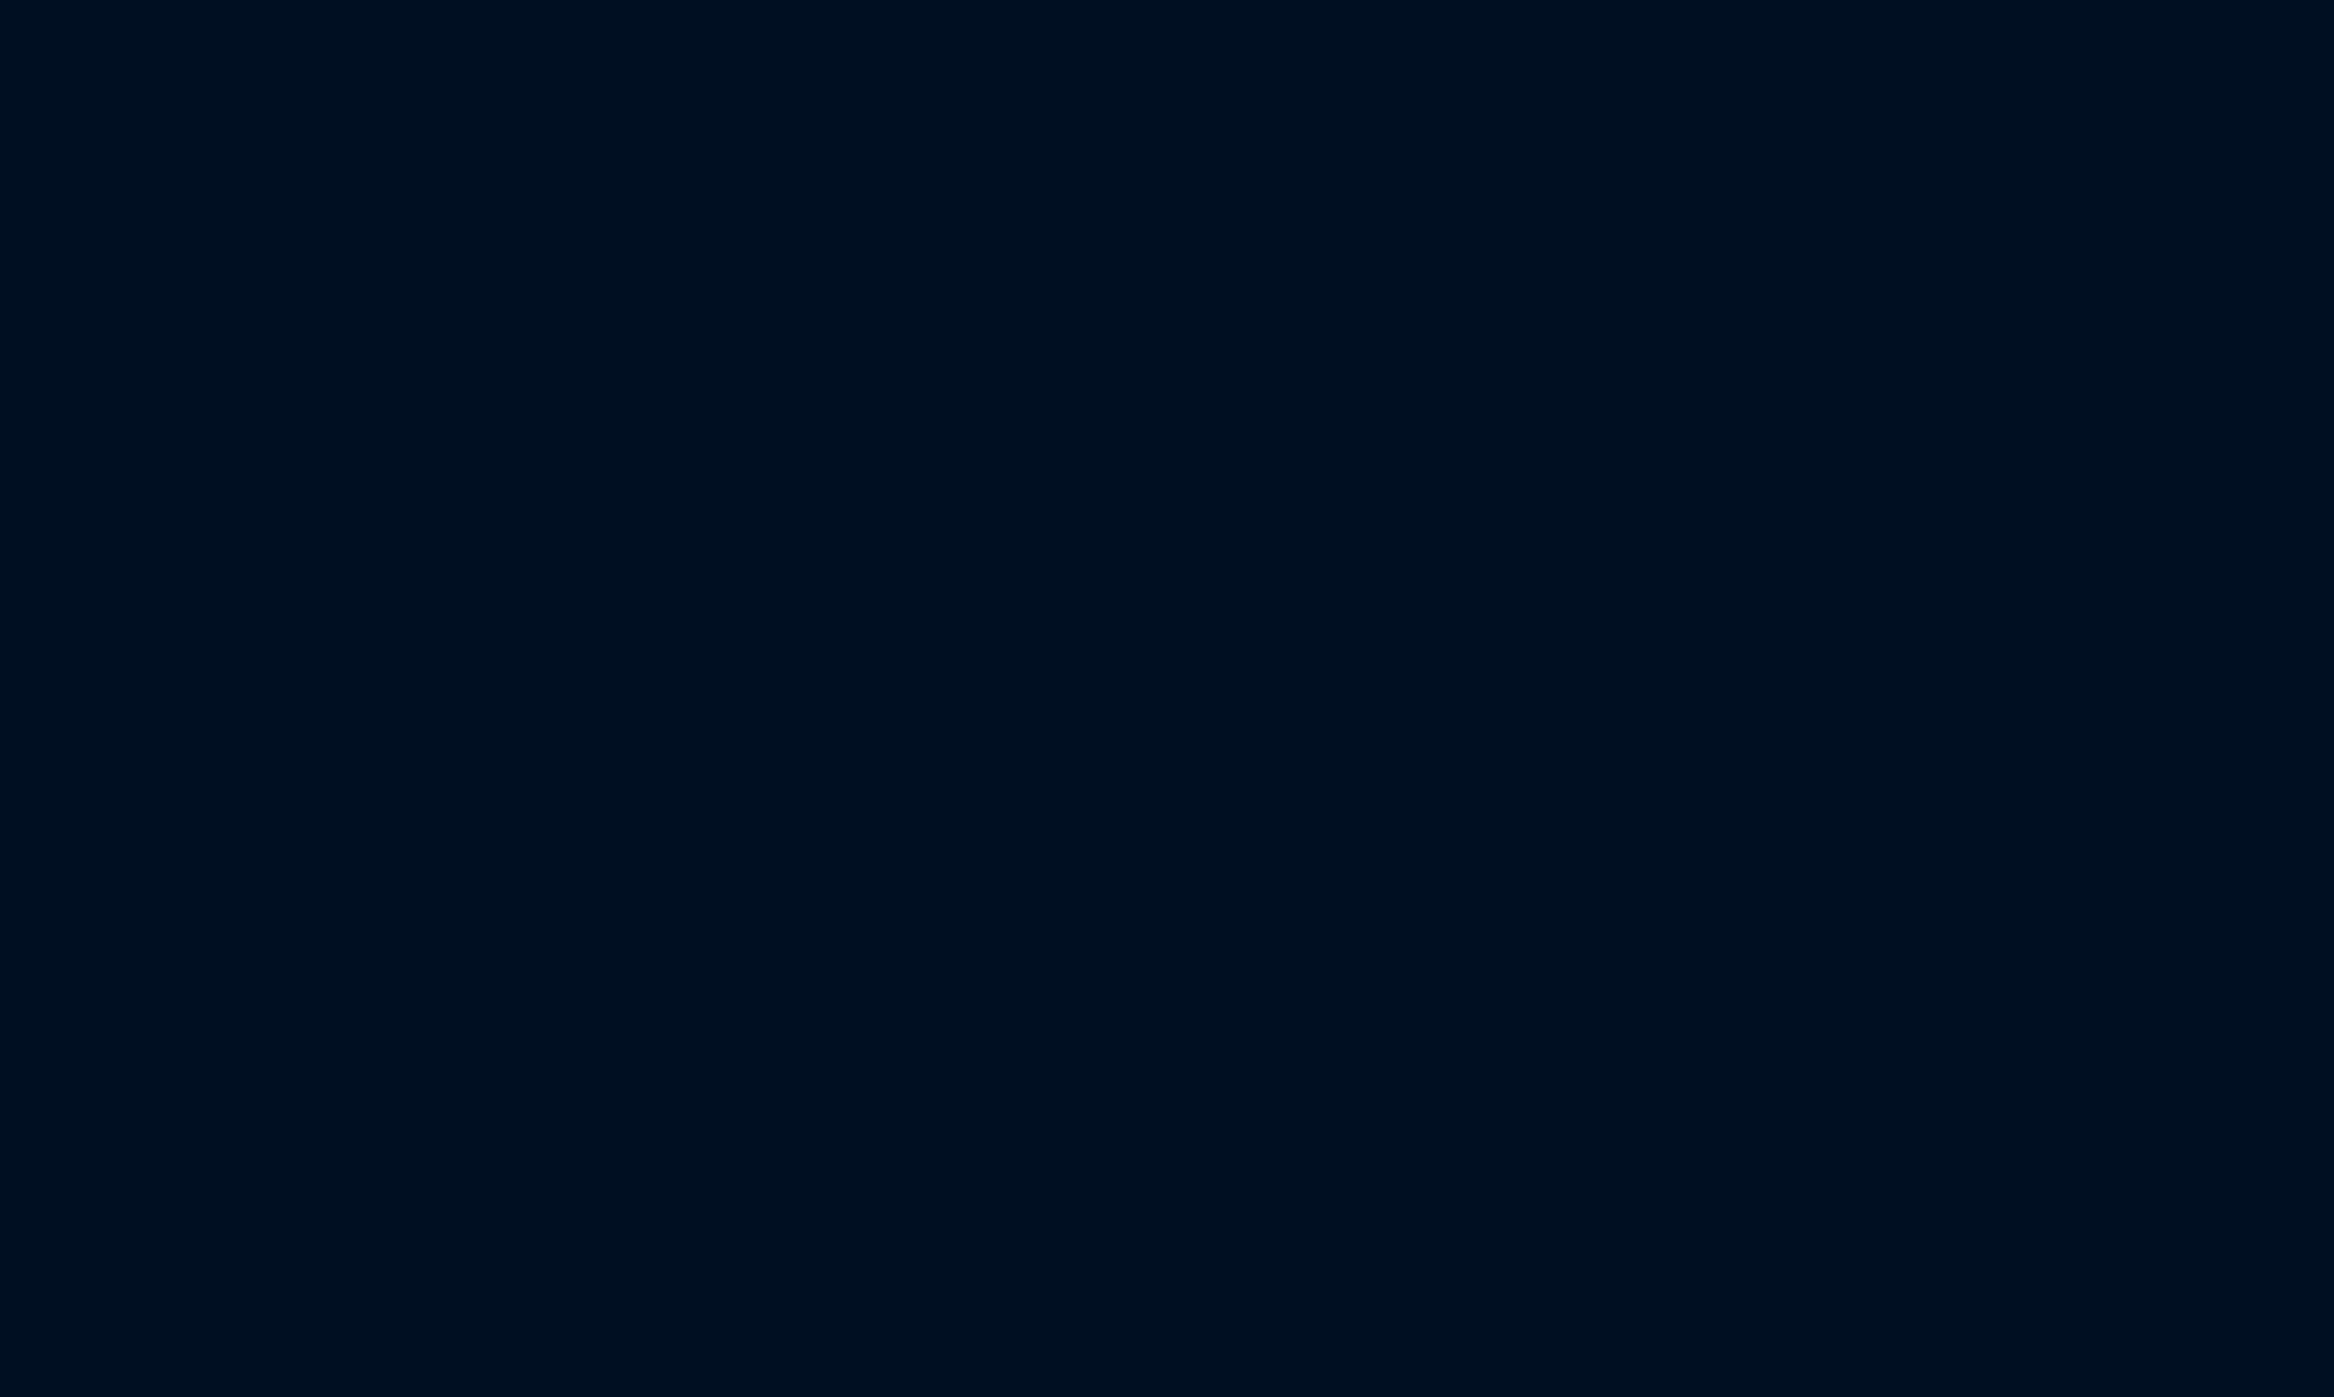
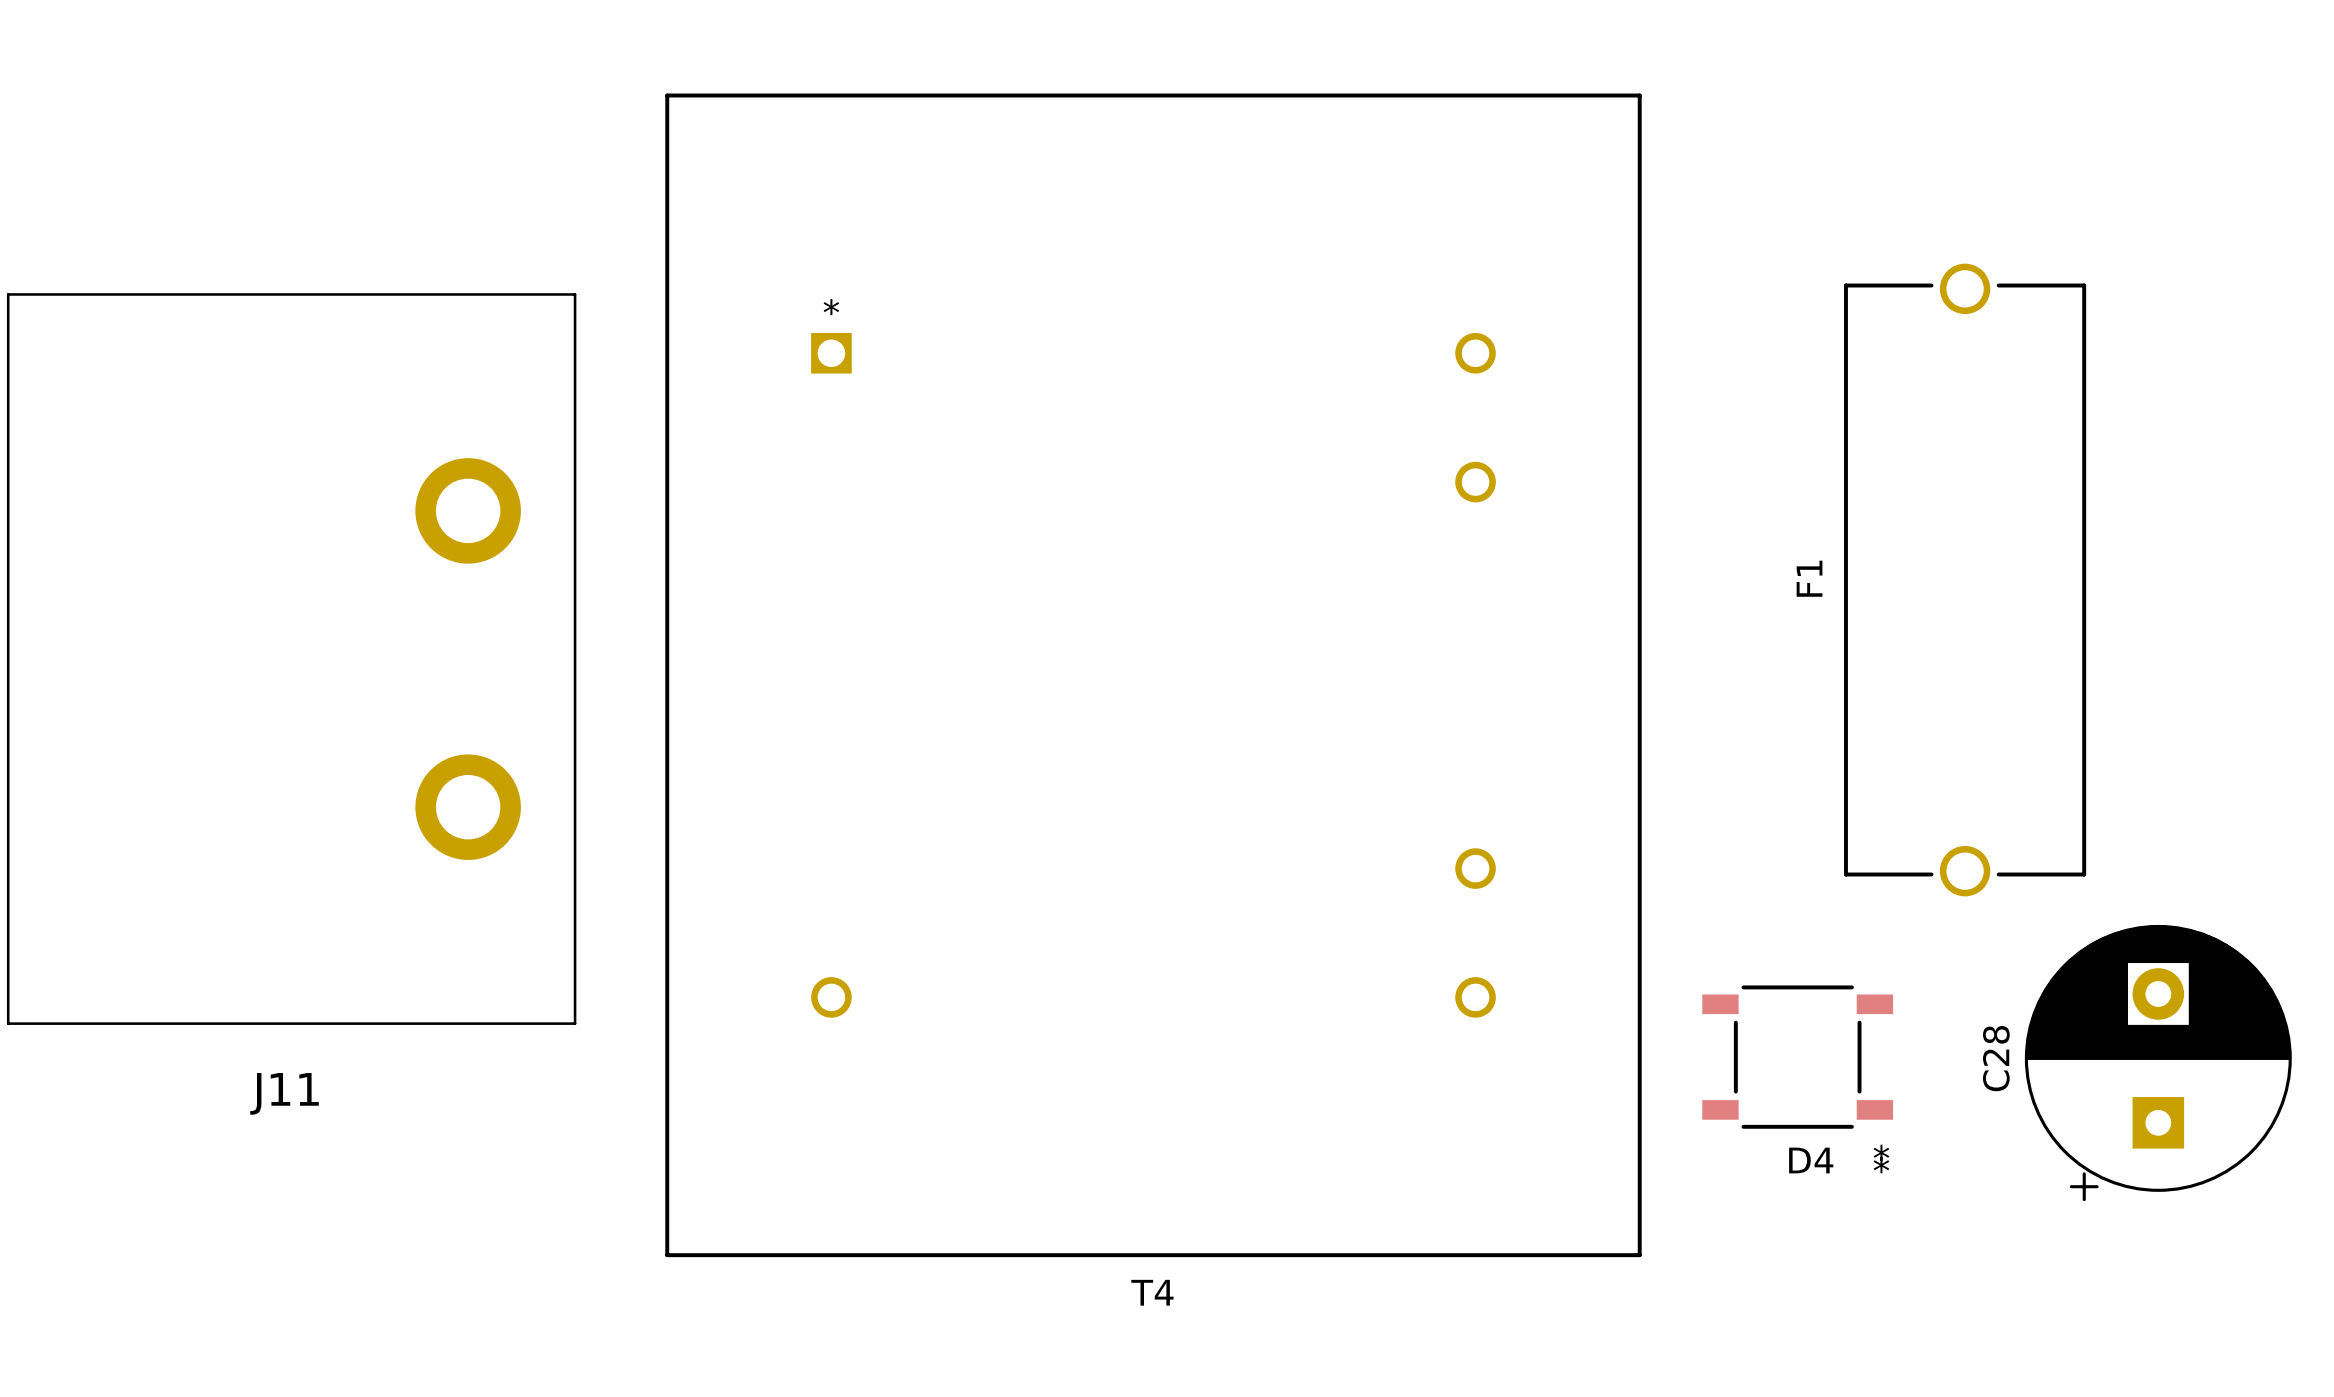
F1: none -> (1965, 580)
J11: none -> (291, 659)
T4: none -> (1153, 675)
D4: none -> (1797, 1057)
C28: none -> (2158, 1063)

